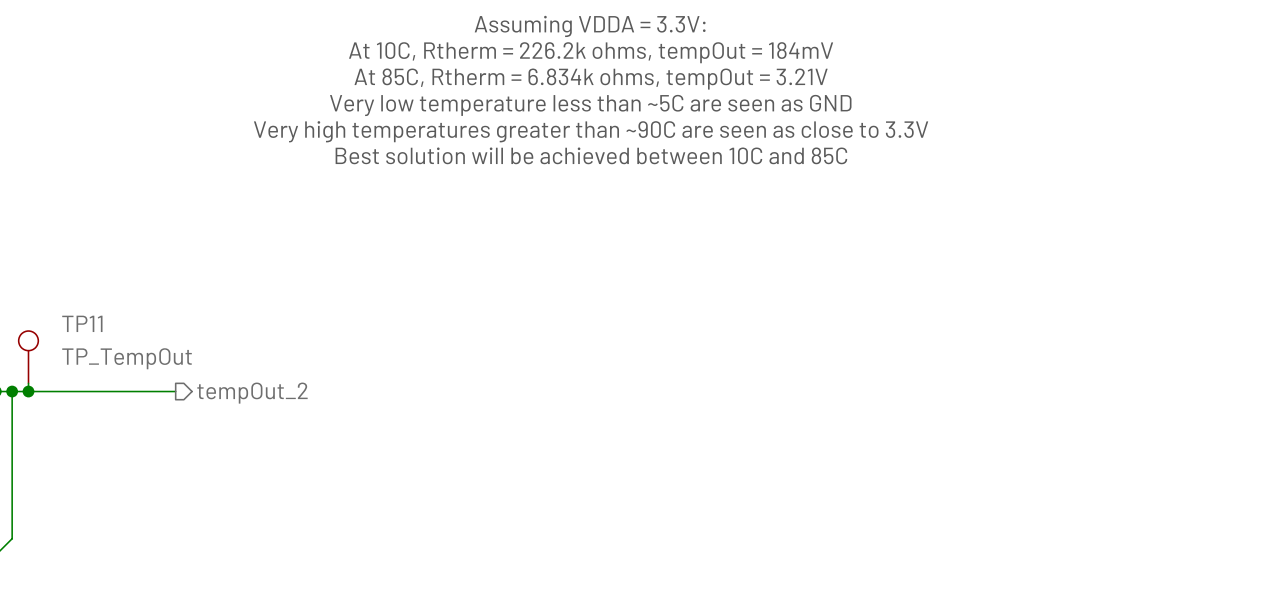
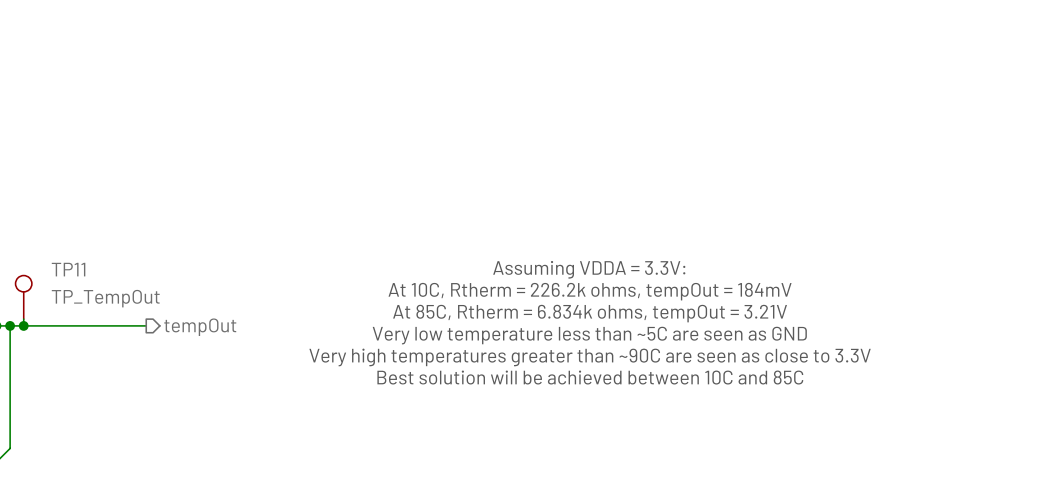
text position: Assuming VDDA = 3.3V: (590, 26) -> Assuming VDDA = 3.3V: (589, 269)
text position: At 10C, Rtherm = 226.2k ohms, tempOut = 184mV (591, 52) -> At 10C, Rtherm = 226.2k ohms, tempOut = 184mV (590, 291)
text position: At 85C, Rtherm = 6.834k ohms, tempOut = 3.21V (591, 79) -> At 85C, Rtherm = 6.834k ohms, tempOut = 3.21V (590, 313)
text position: Very low temperature less than ~5C are seen as GND (590, 105) -> Very low temperature less than ~5C are seen as GND (589, 335)
text position: Very high temperatures greater than ~90C are seen as close to 3.3V (591, 131) -> Very high temperatures greater than ~90C are seen as close to 3.3V (590, 357)
text position: Best solution will be achieved between 10C and 85C (591, 155) -> Best solution will be achieved between 10C and 85C (590, 377)
hierarchical label: tempOut_2 (252, 393) -> tempOut (200, 327)

